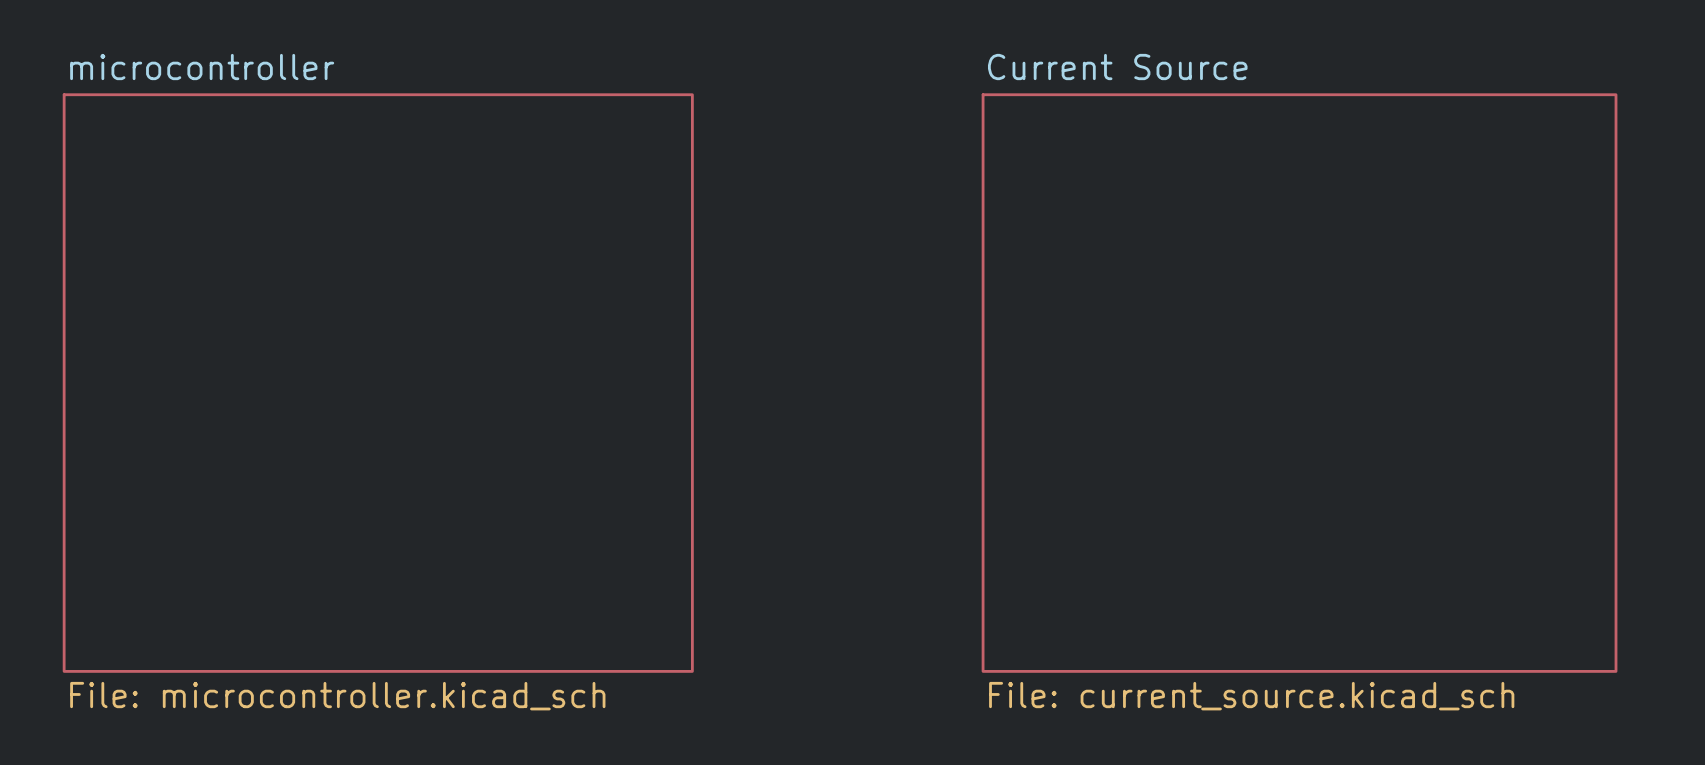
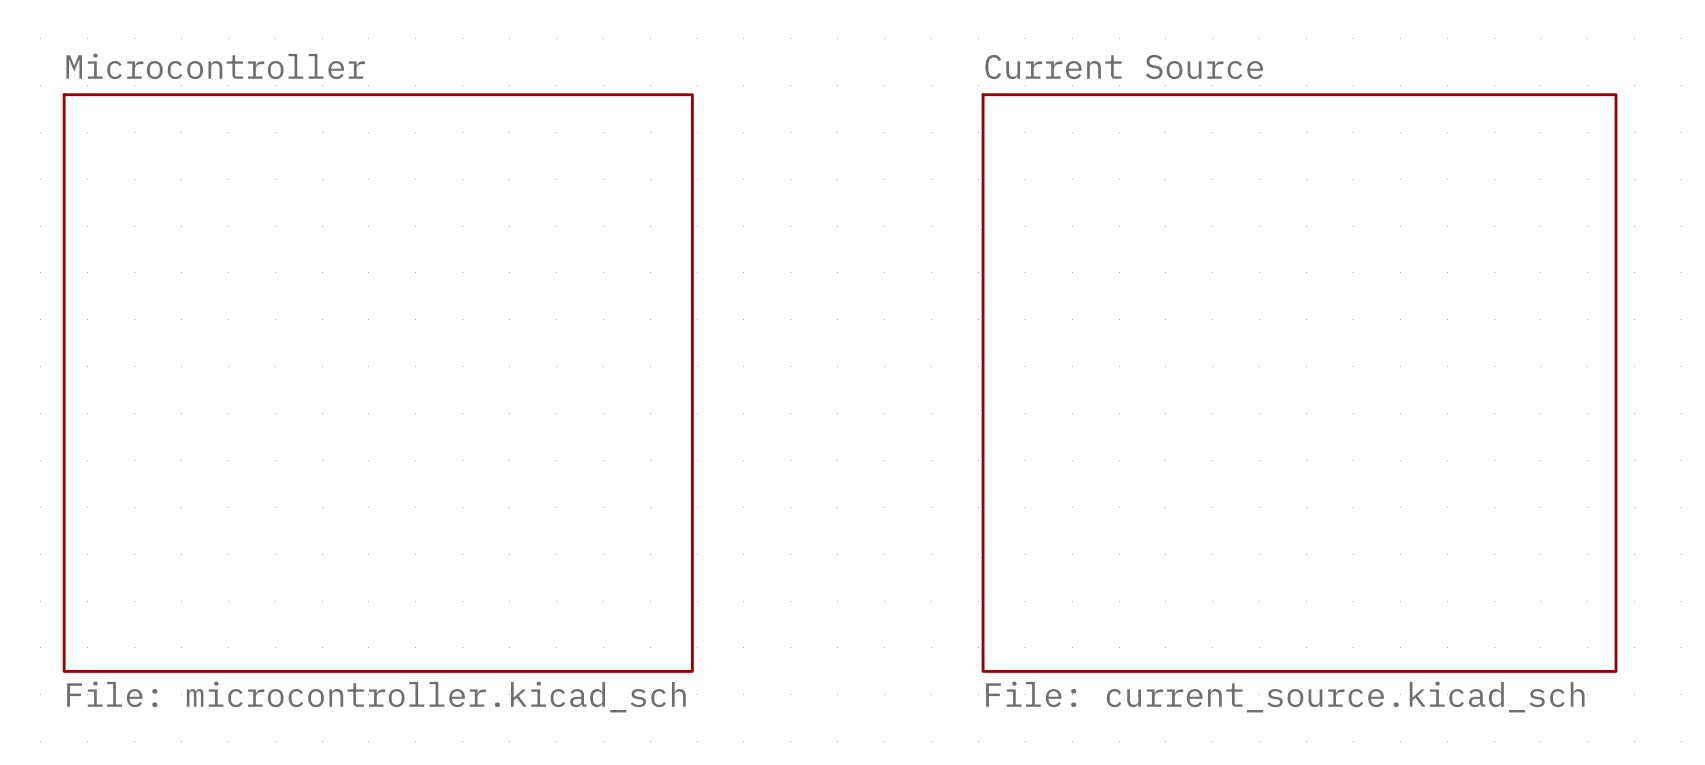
sheet microcontroller name: microcontroller (202, 67) -> Microcontroller (215, 66)

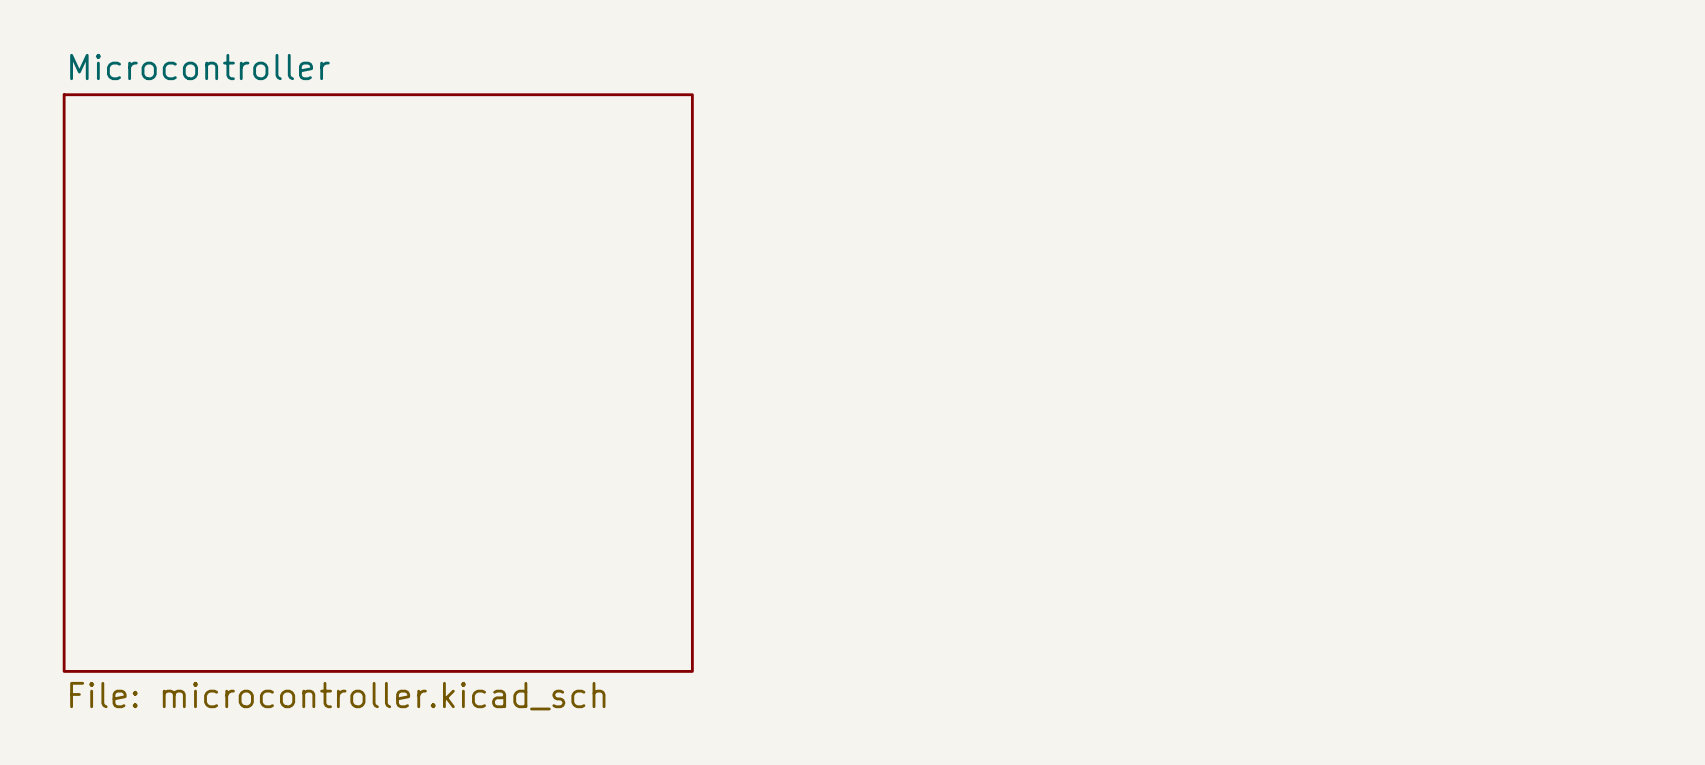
sheet Current Source: File: current_source.kicad_sch (1299, 383) -> none

